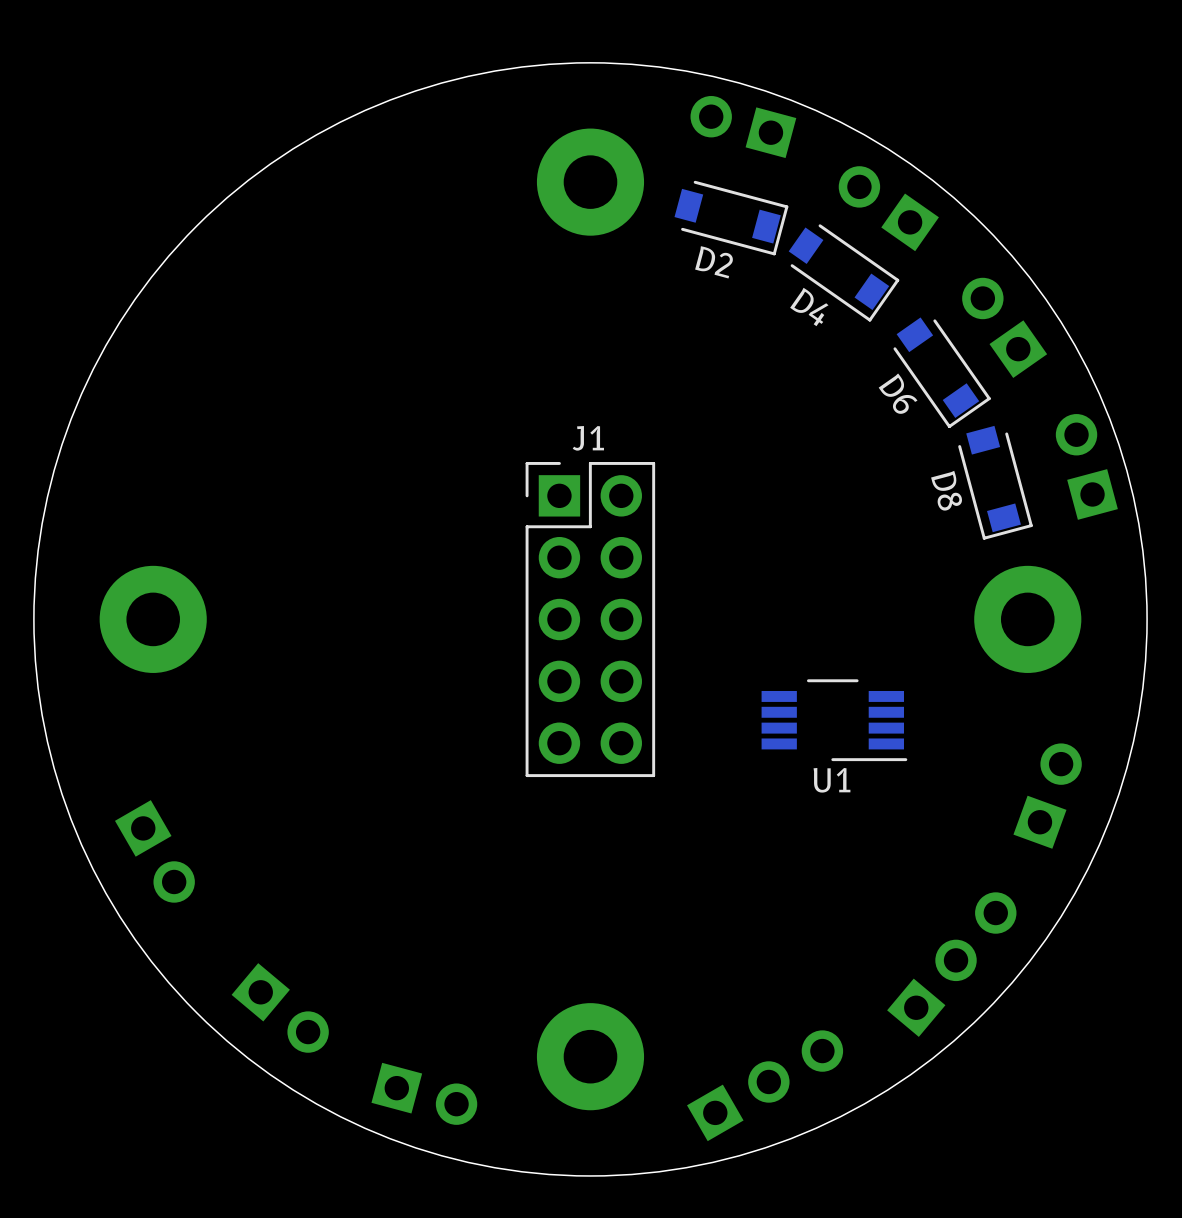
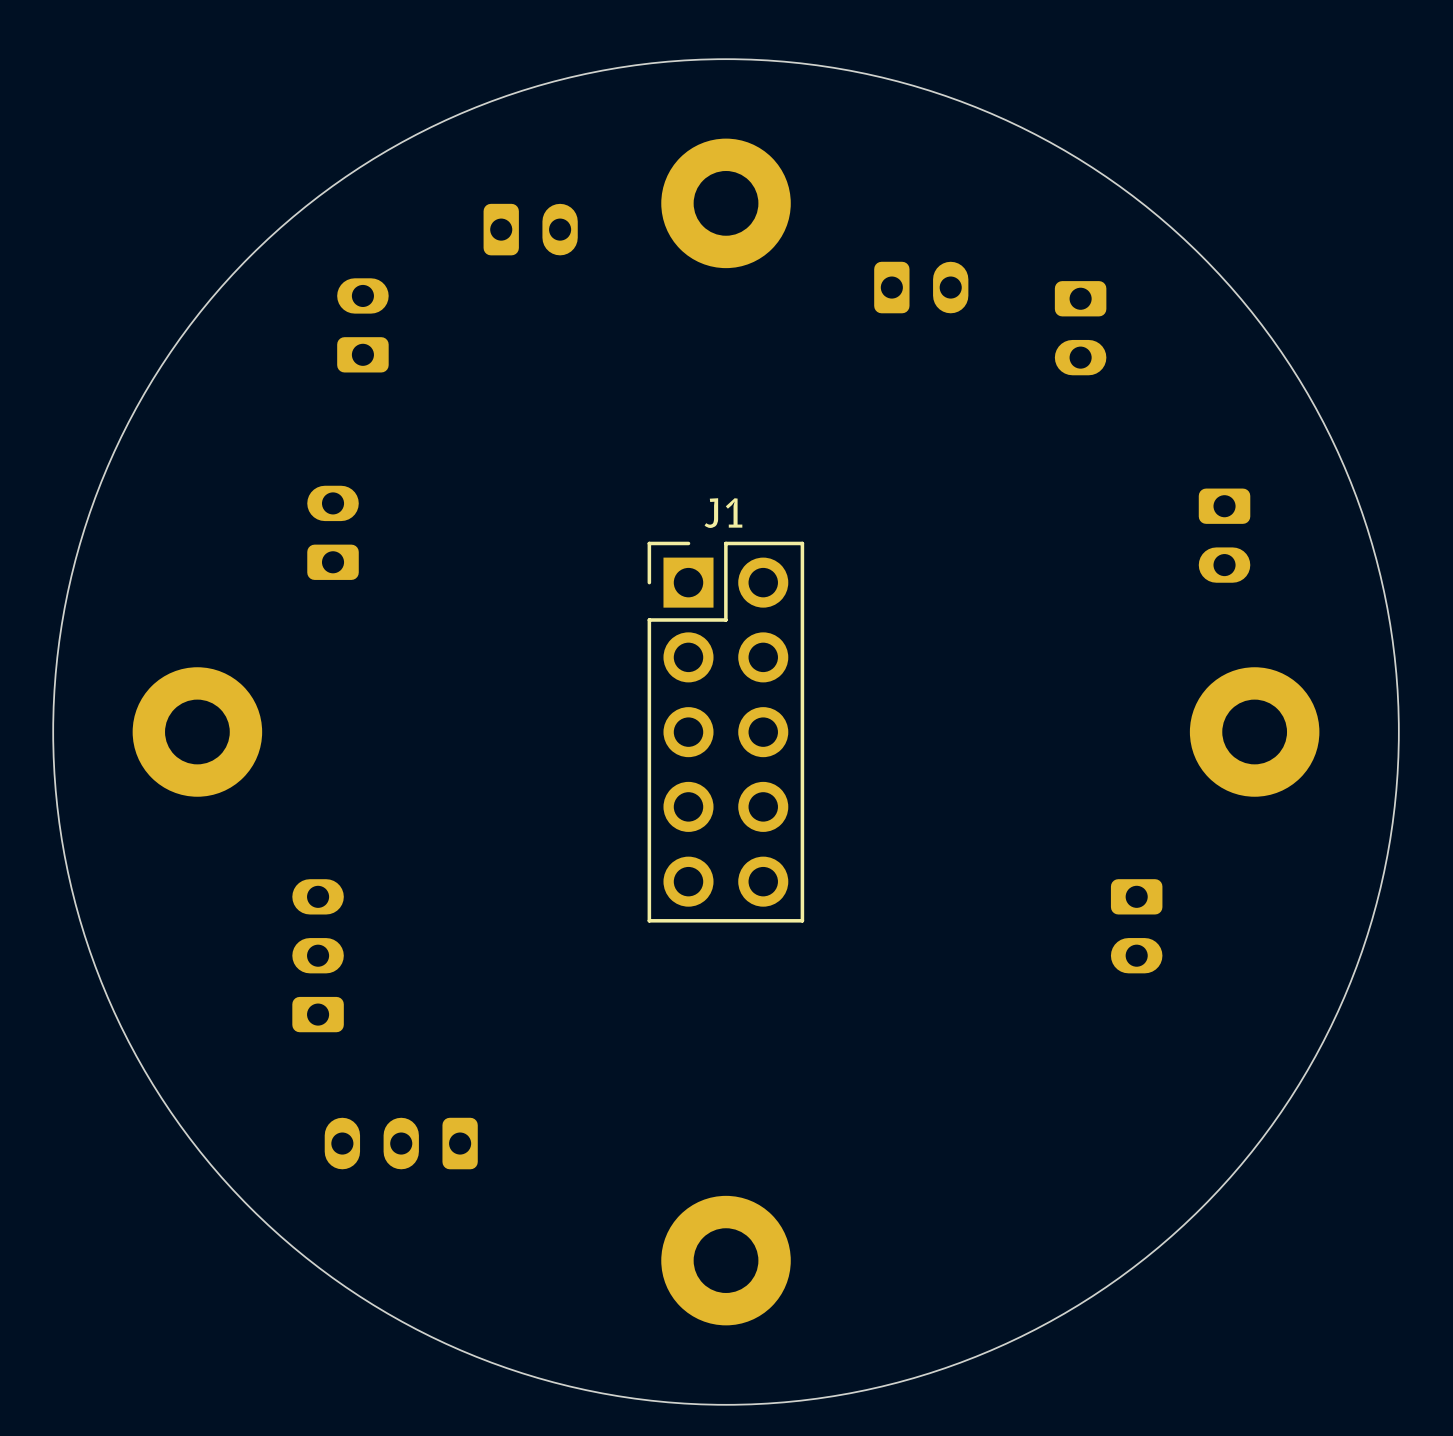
part: (743, 127) -> none
part: none -> (530, 229)
part: (888, 208) -> none
D2: (731, 218) -> none
part: none -> (921, 287)
D4: (843, 272) -> none
part: none -> (362, 325)
part: none -> (1080, 328)
part: (1004, 327) -> none
D6: (942, 372) -> none
part: none -> (333, 532)
part: none -> (1224, 535)
part: (1086, 466) -> none
D8: (995, 482) -> none
U1: (834, 720) -> none
part: none -> (1136, 926)
part: (1047, 796) -> none
part: none -> (318, 955)
part: (154, 851) -> none
part: none -> (401, 1143)
part: (951, 964) -> none
part: (280, 1007) -> none
part: (765, 1085) -> none
part: (424, 1093) -> none

